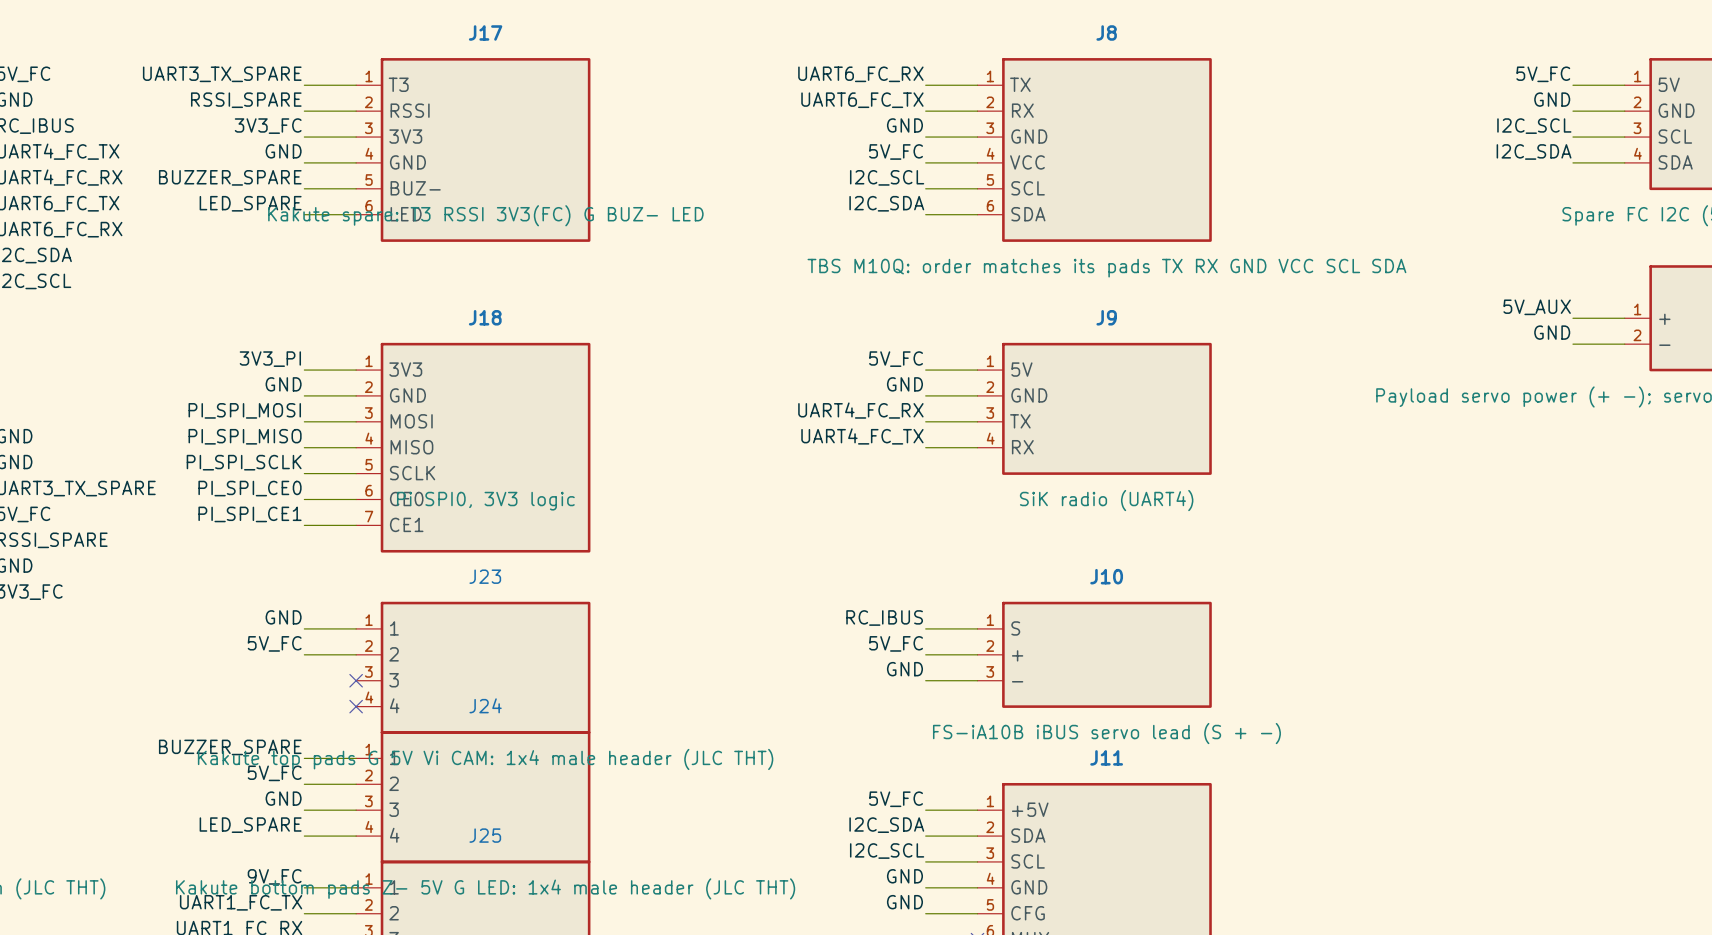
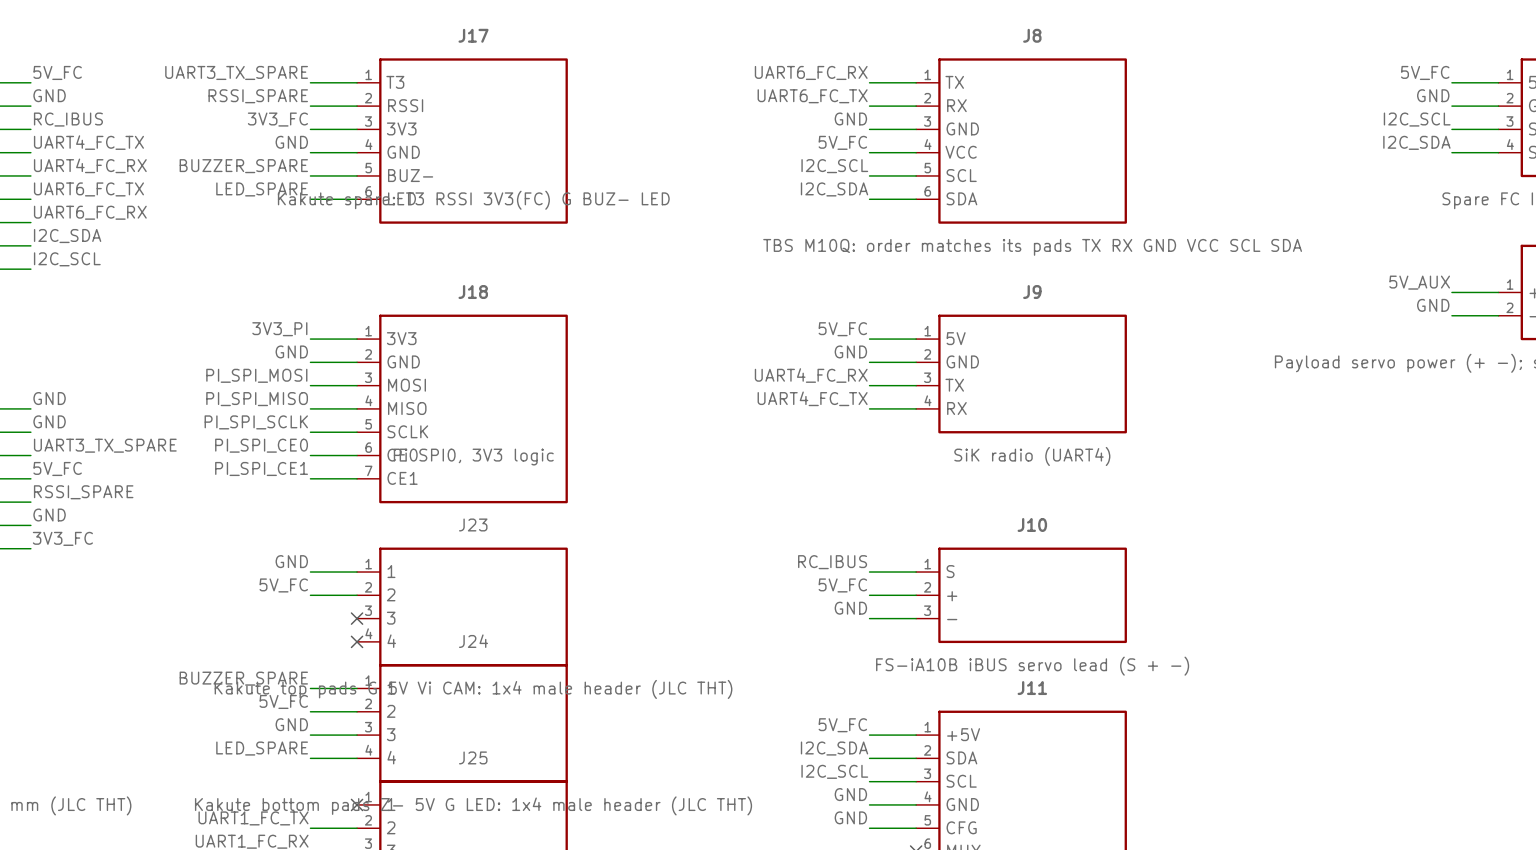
label: 9V_FC (274, 876) -> none
wire: (304, 887) (356, 887) -> none
no-connect mark: none -> (357, 804)

